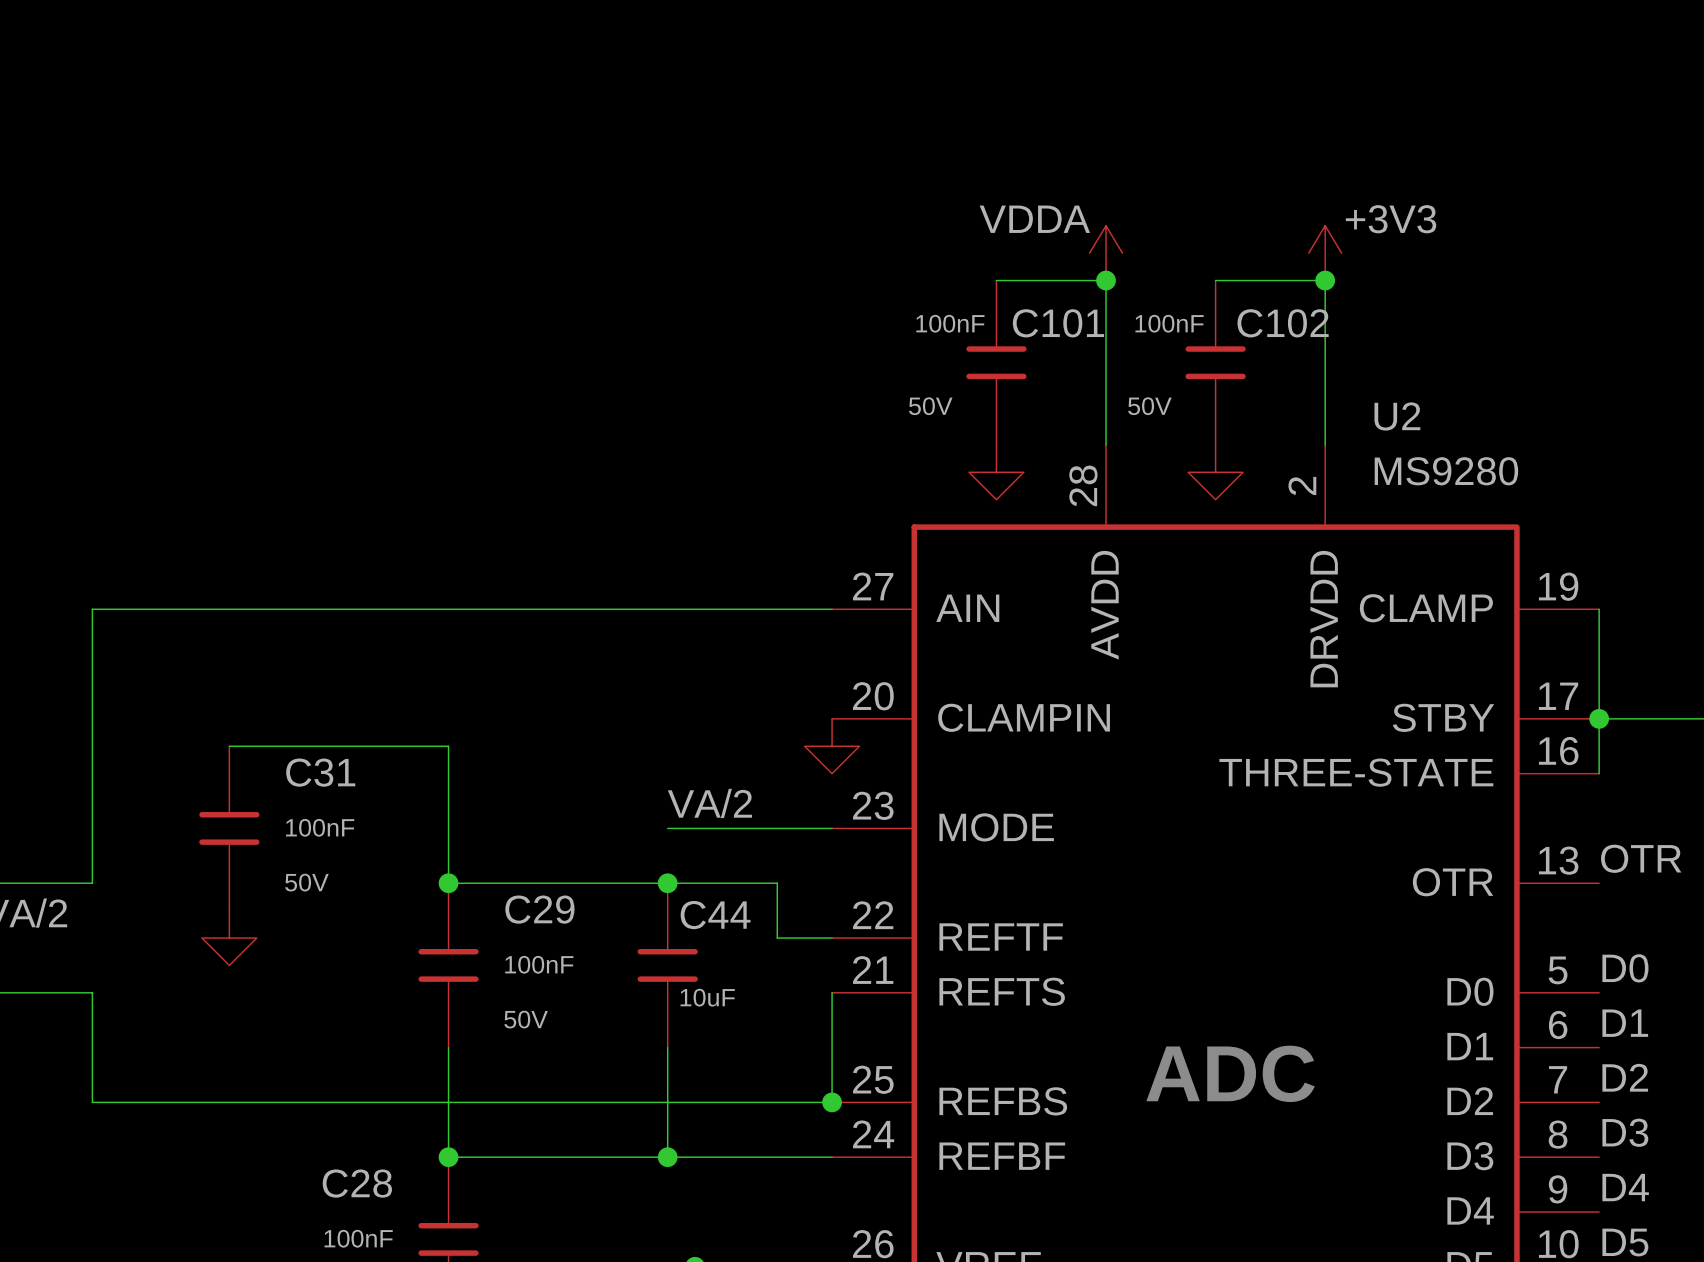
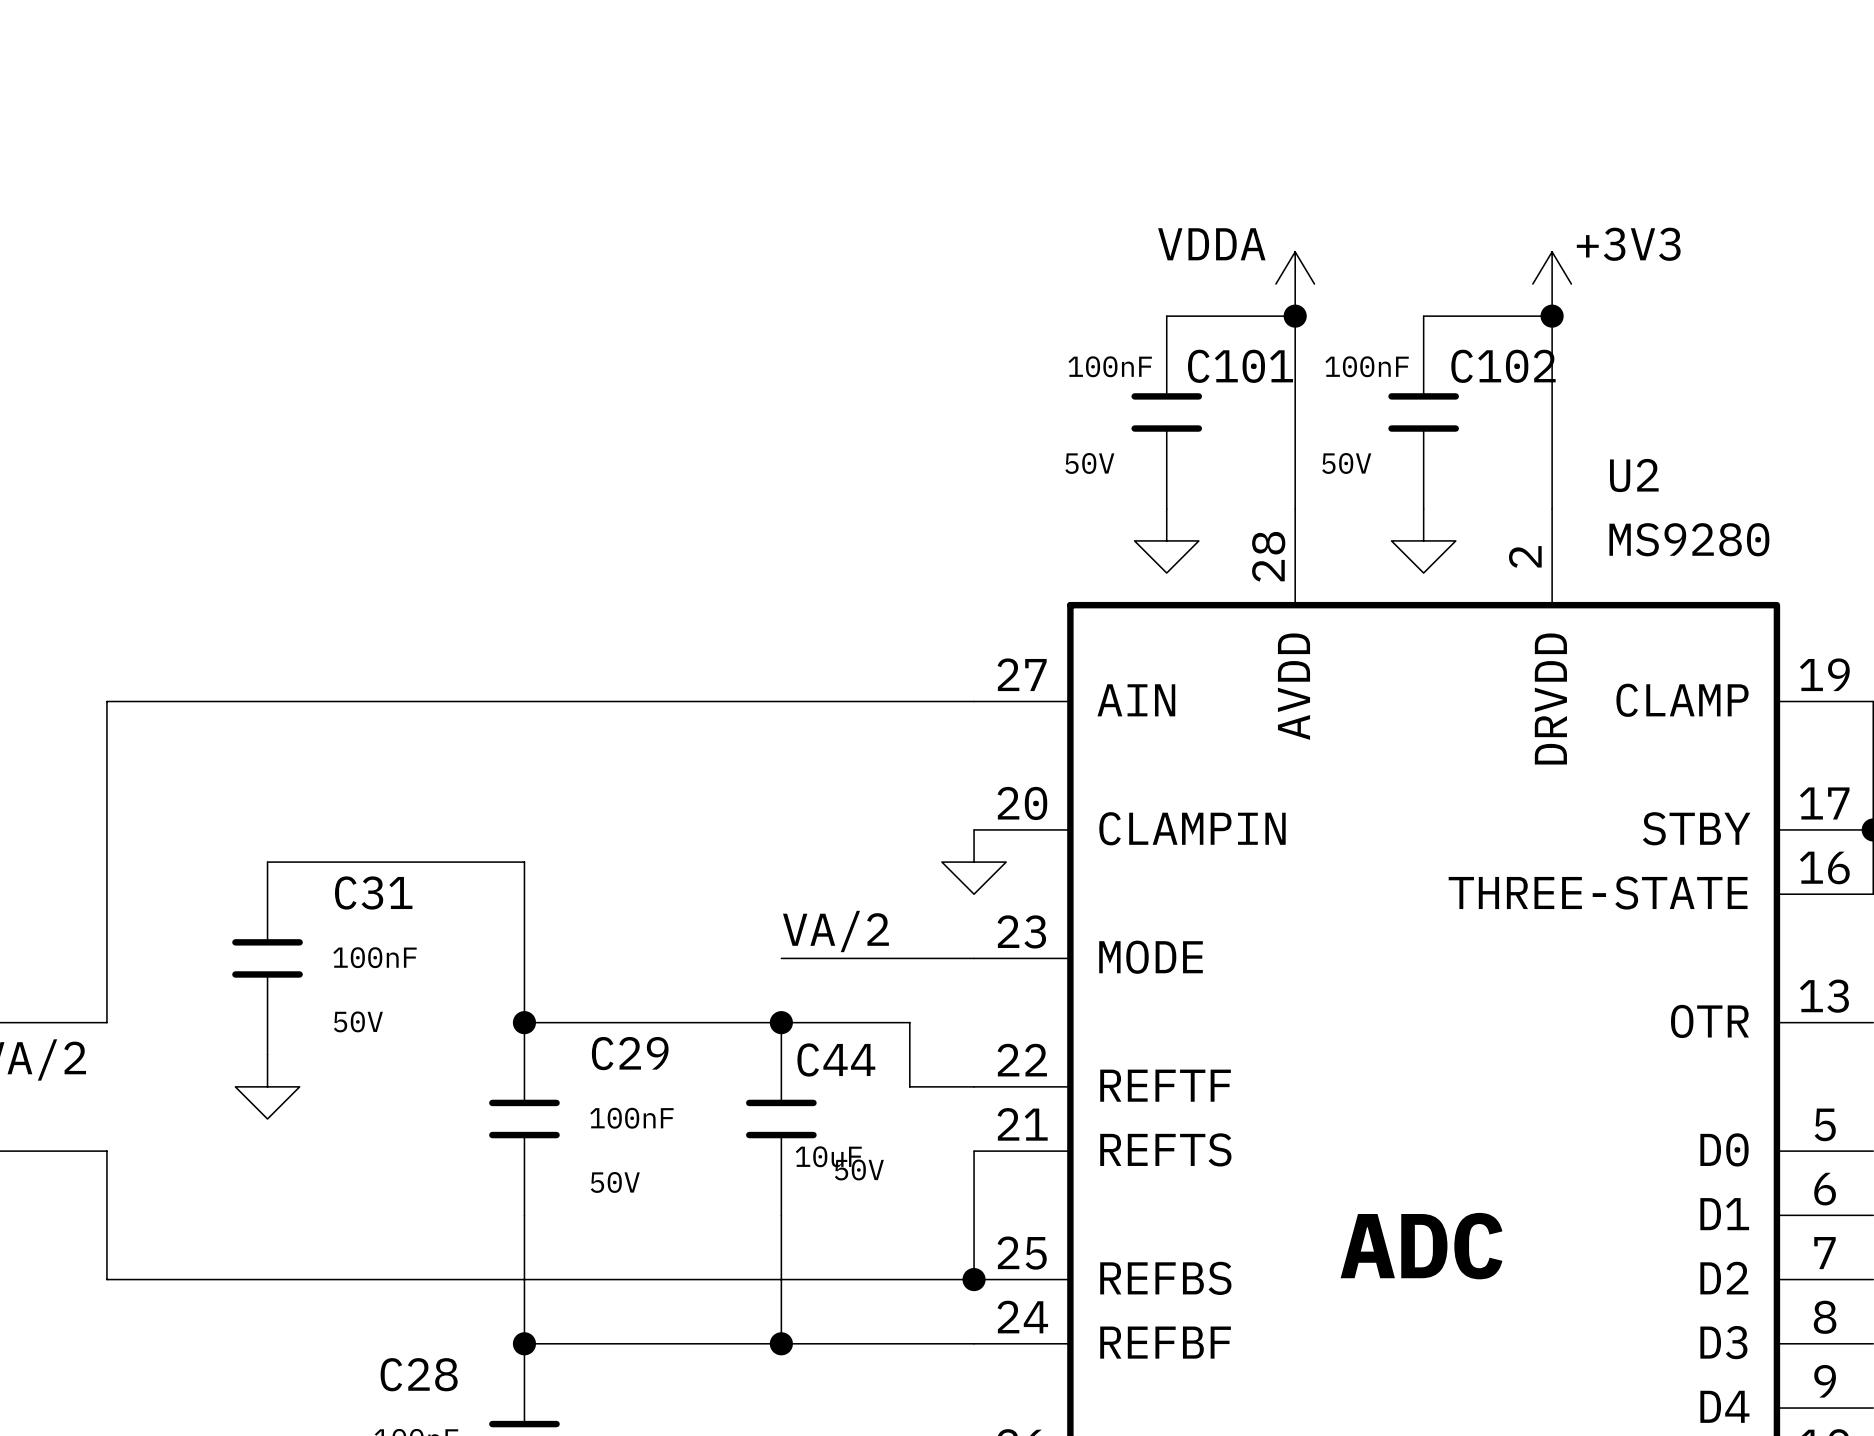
C44 text: none -> 50V (859, 1169)

